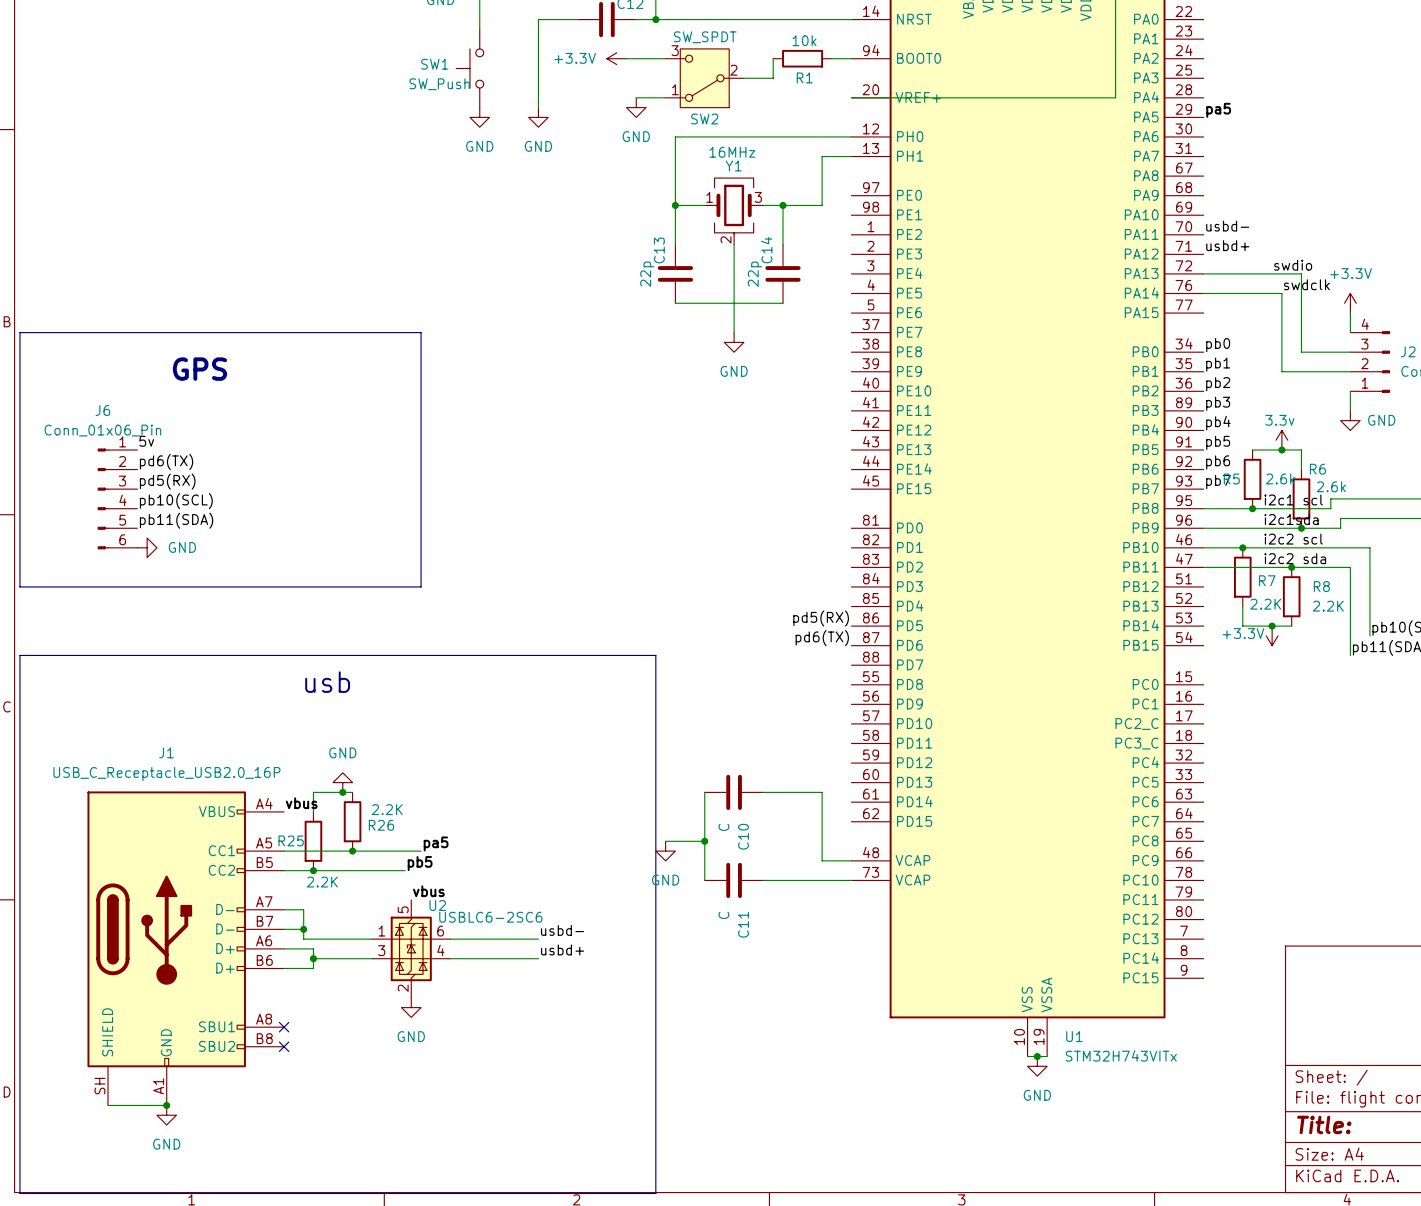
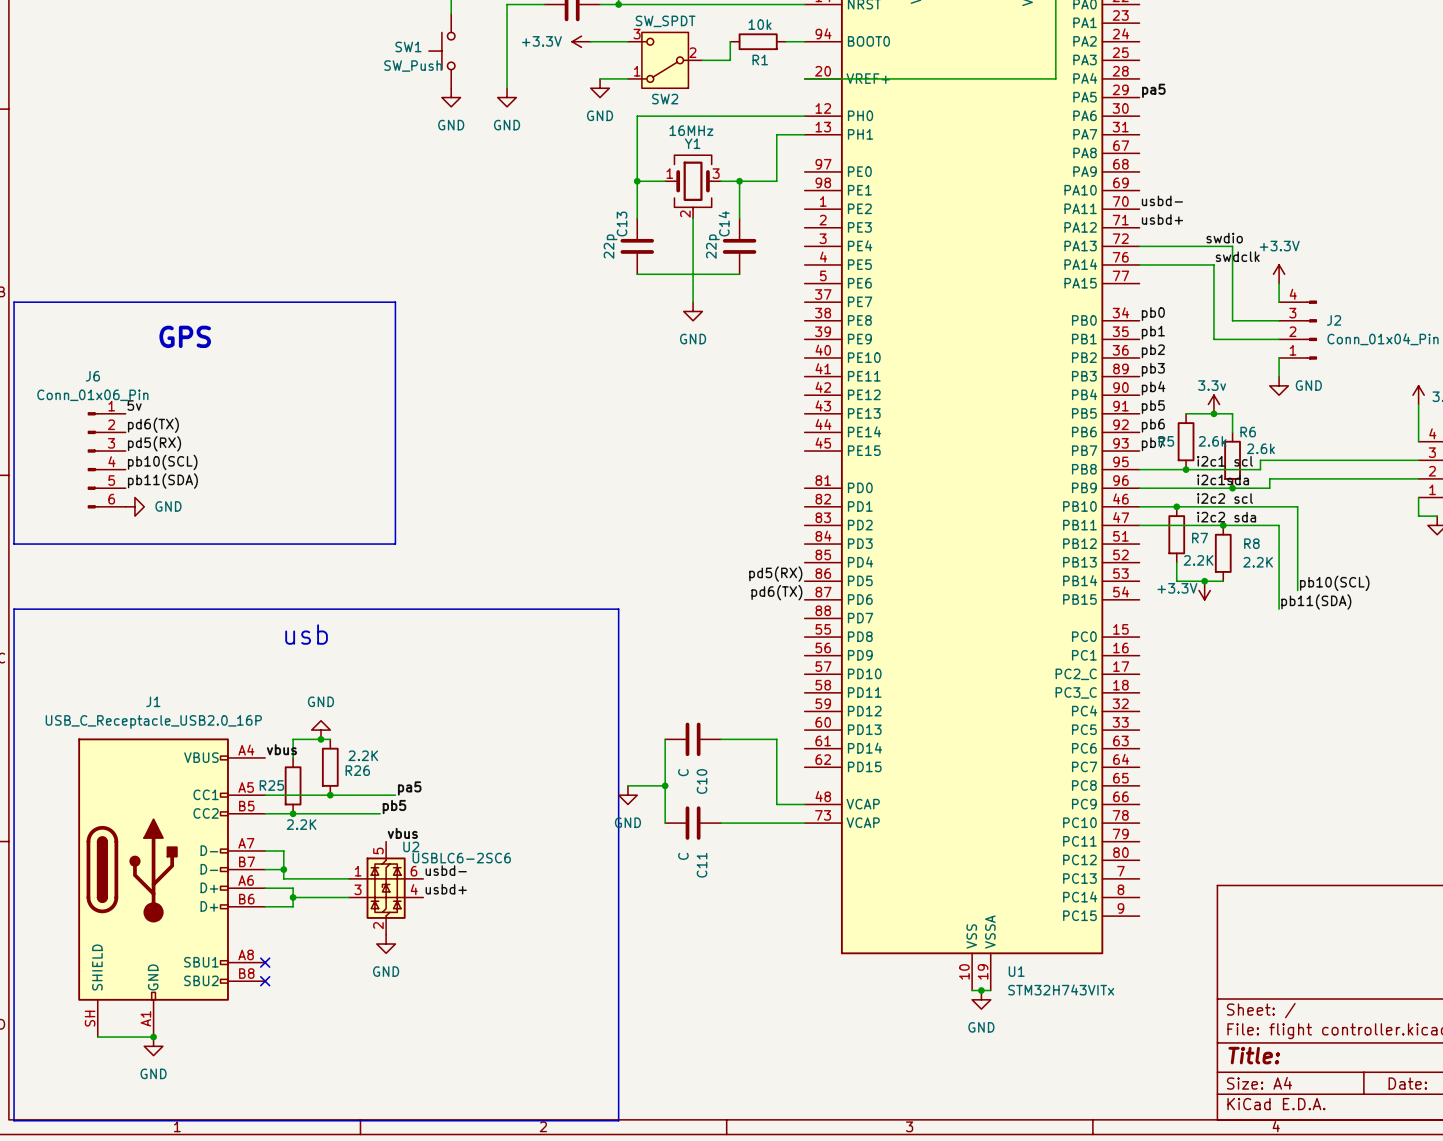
label position: usbd- (562, 930) -> usbd- (446, 870)
wire: (450, 939) (538, 939) -> none
label position: usbd+ (562, 949) -> usbd+ (446, 889)
wire: (450, 958) (538, 958) -> none

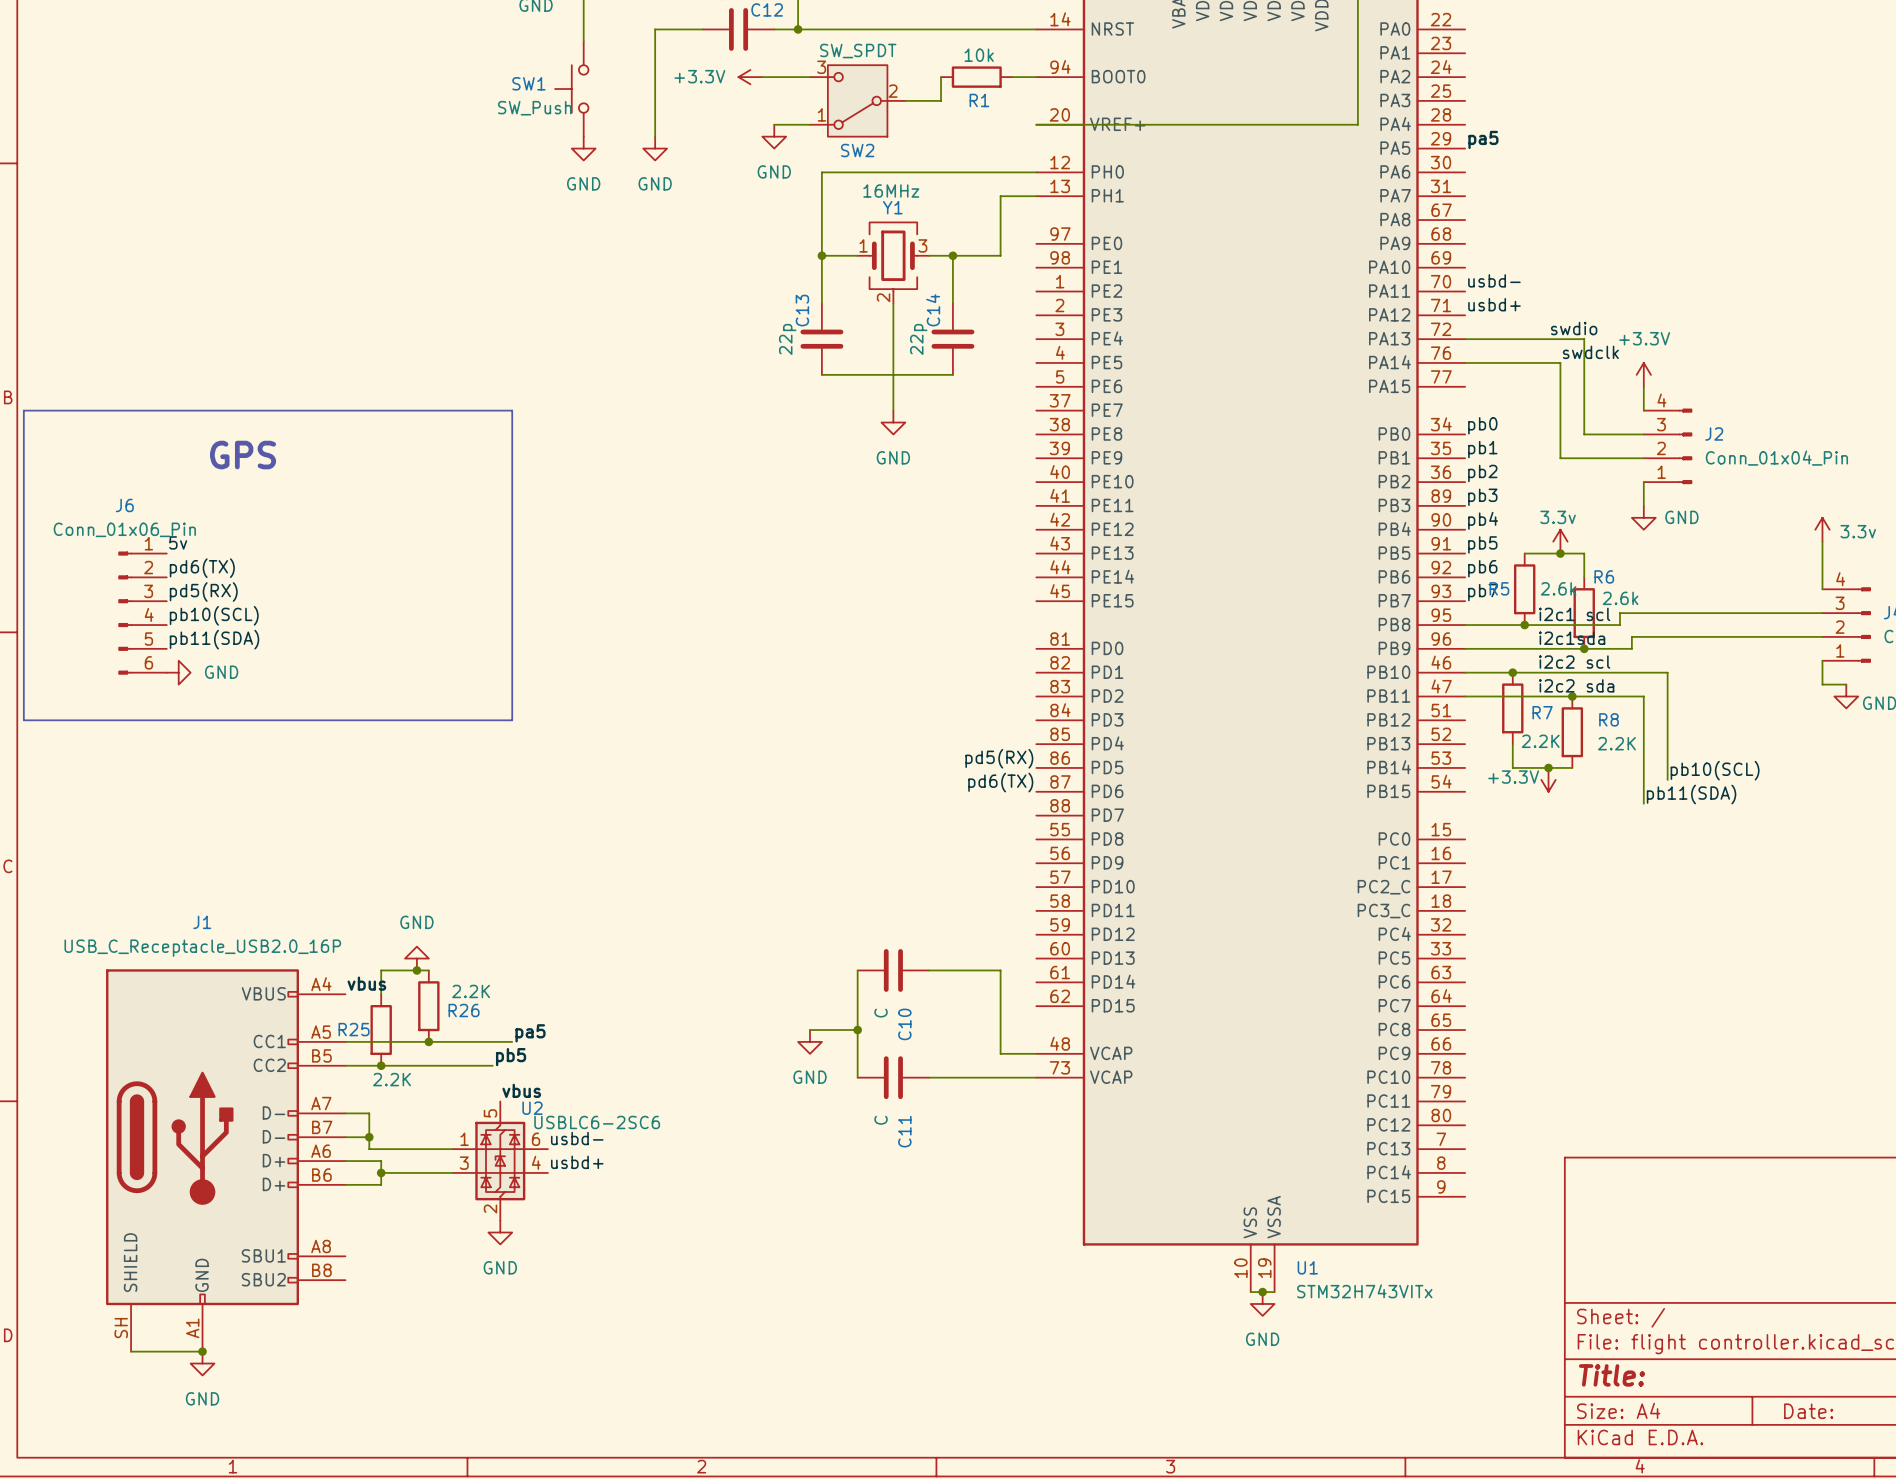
line: (14, 609) (618, 609) (618, 1120) (14, 1120) (14, 609) -> none
text: usb (306, 634) -> none
no-connect mark: (265, 962) -> none
no-connect mark: (265, 981) -> none

